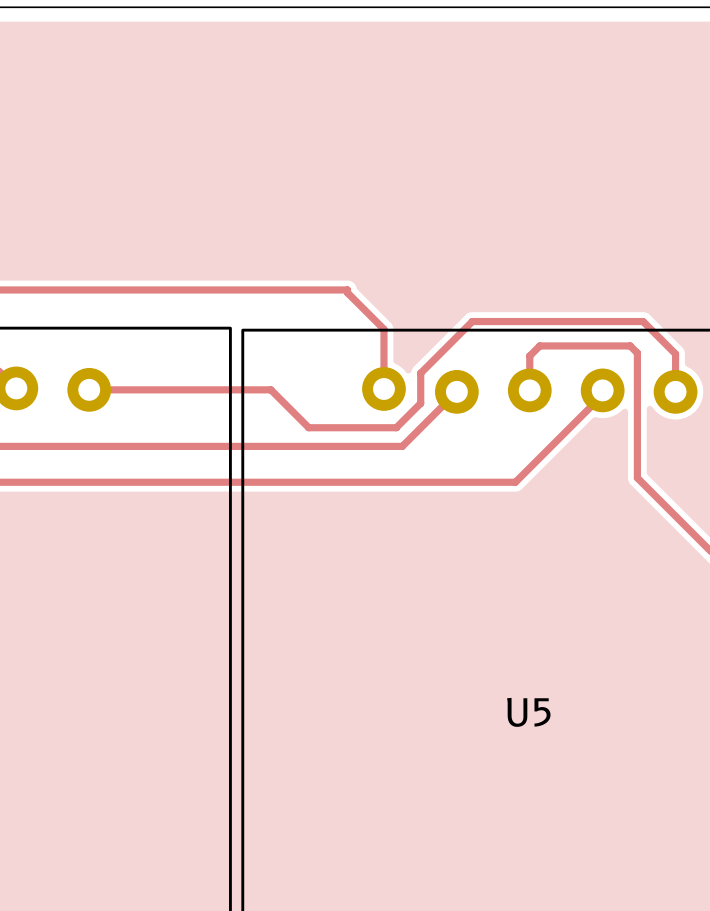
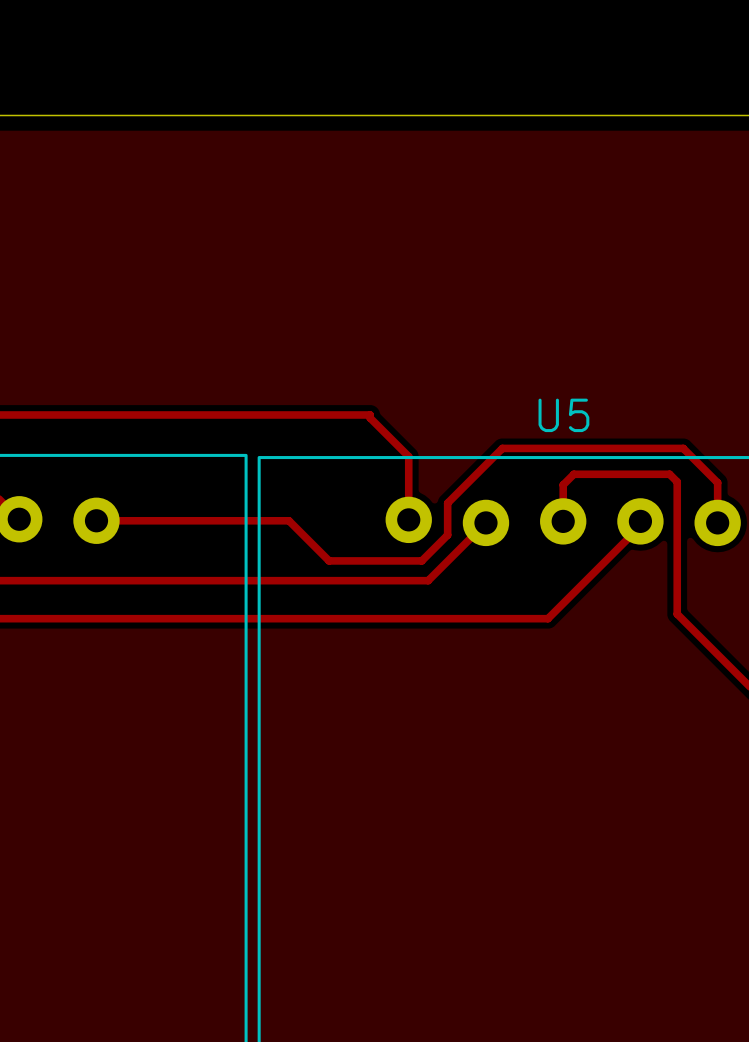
U5 name position: U5 (528, 712) -> U5 (563, 415)

